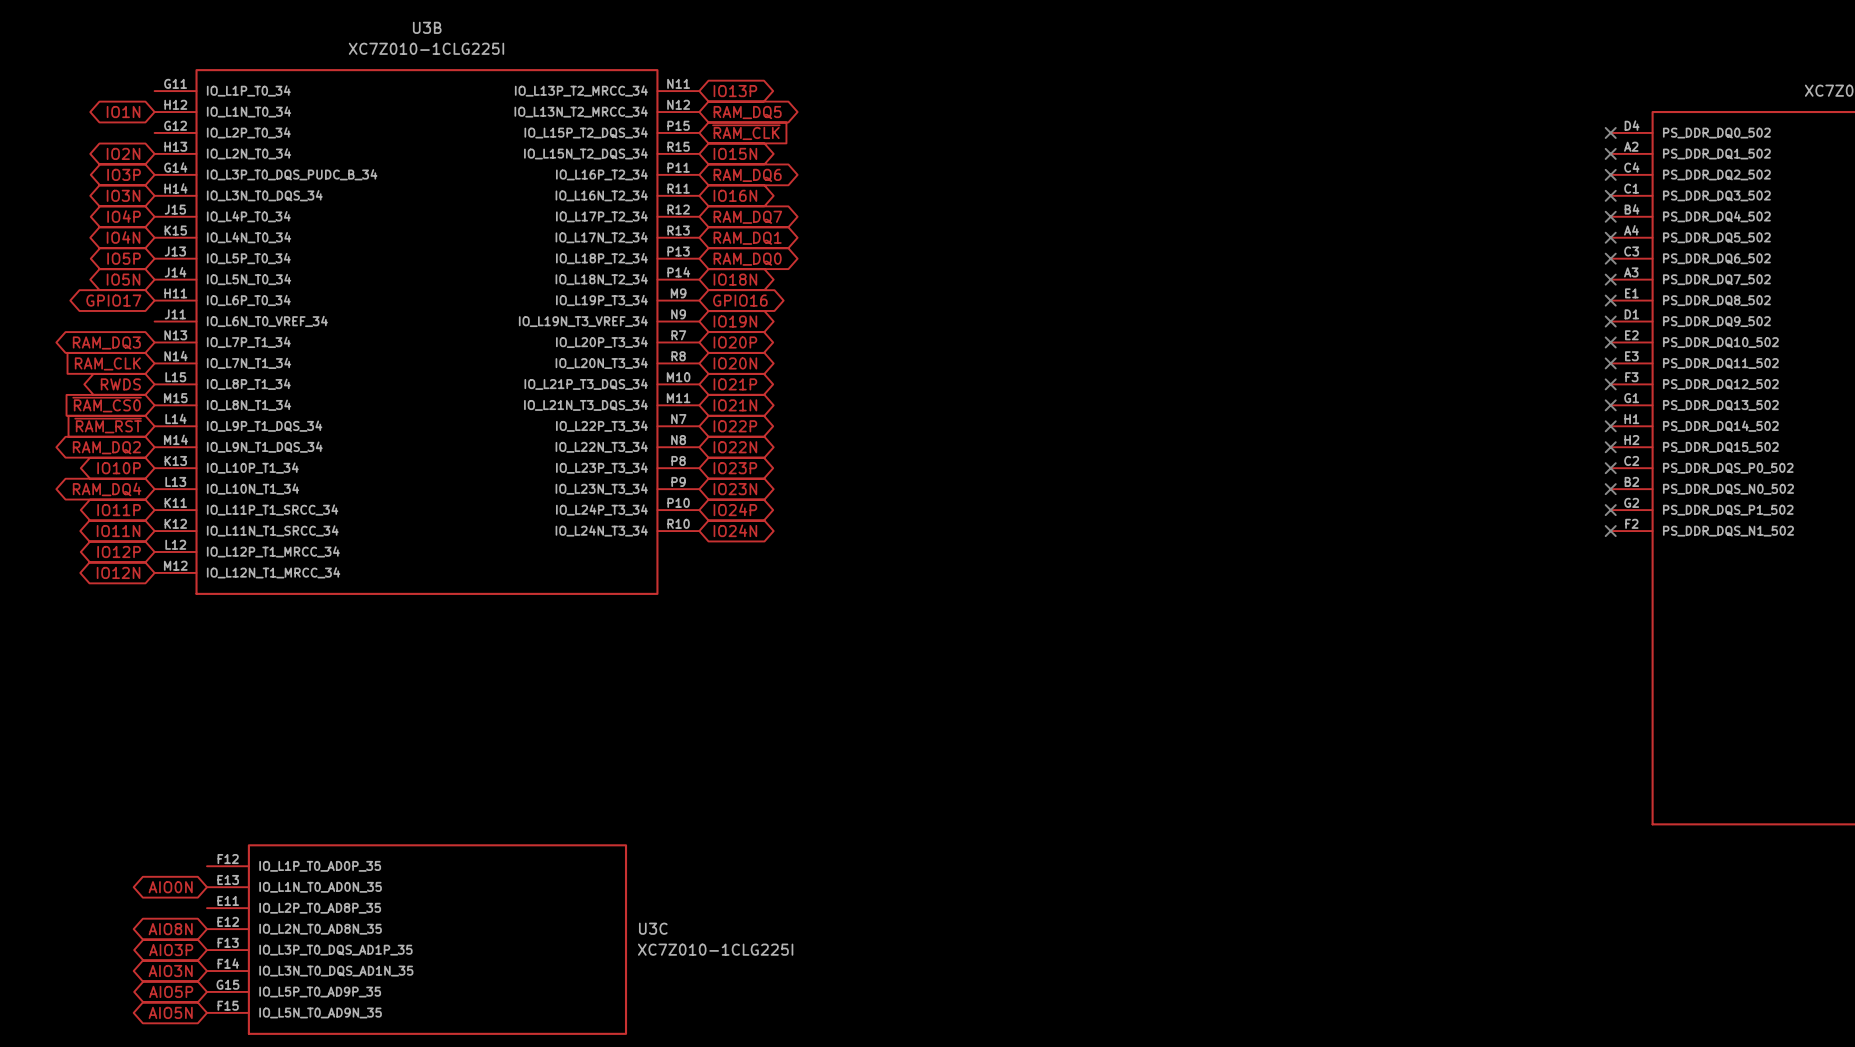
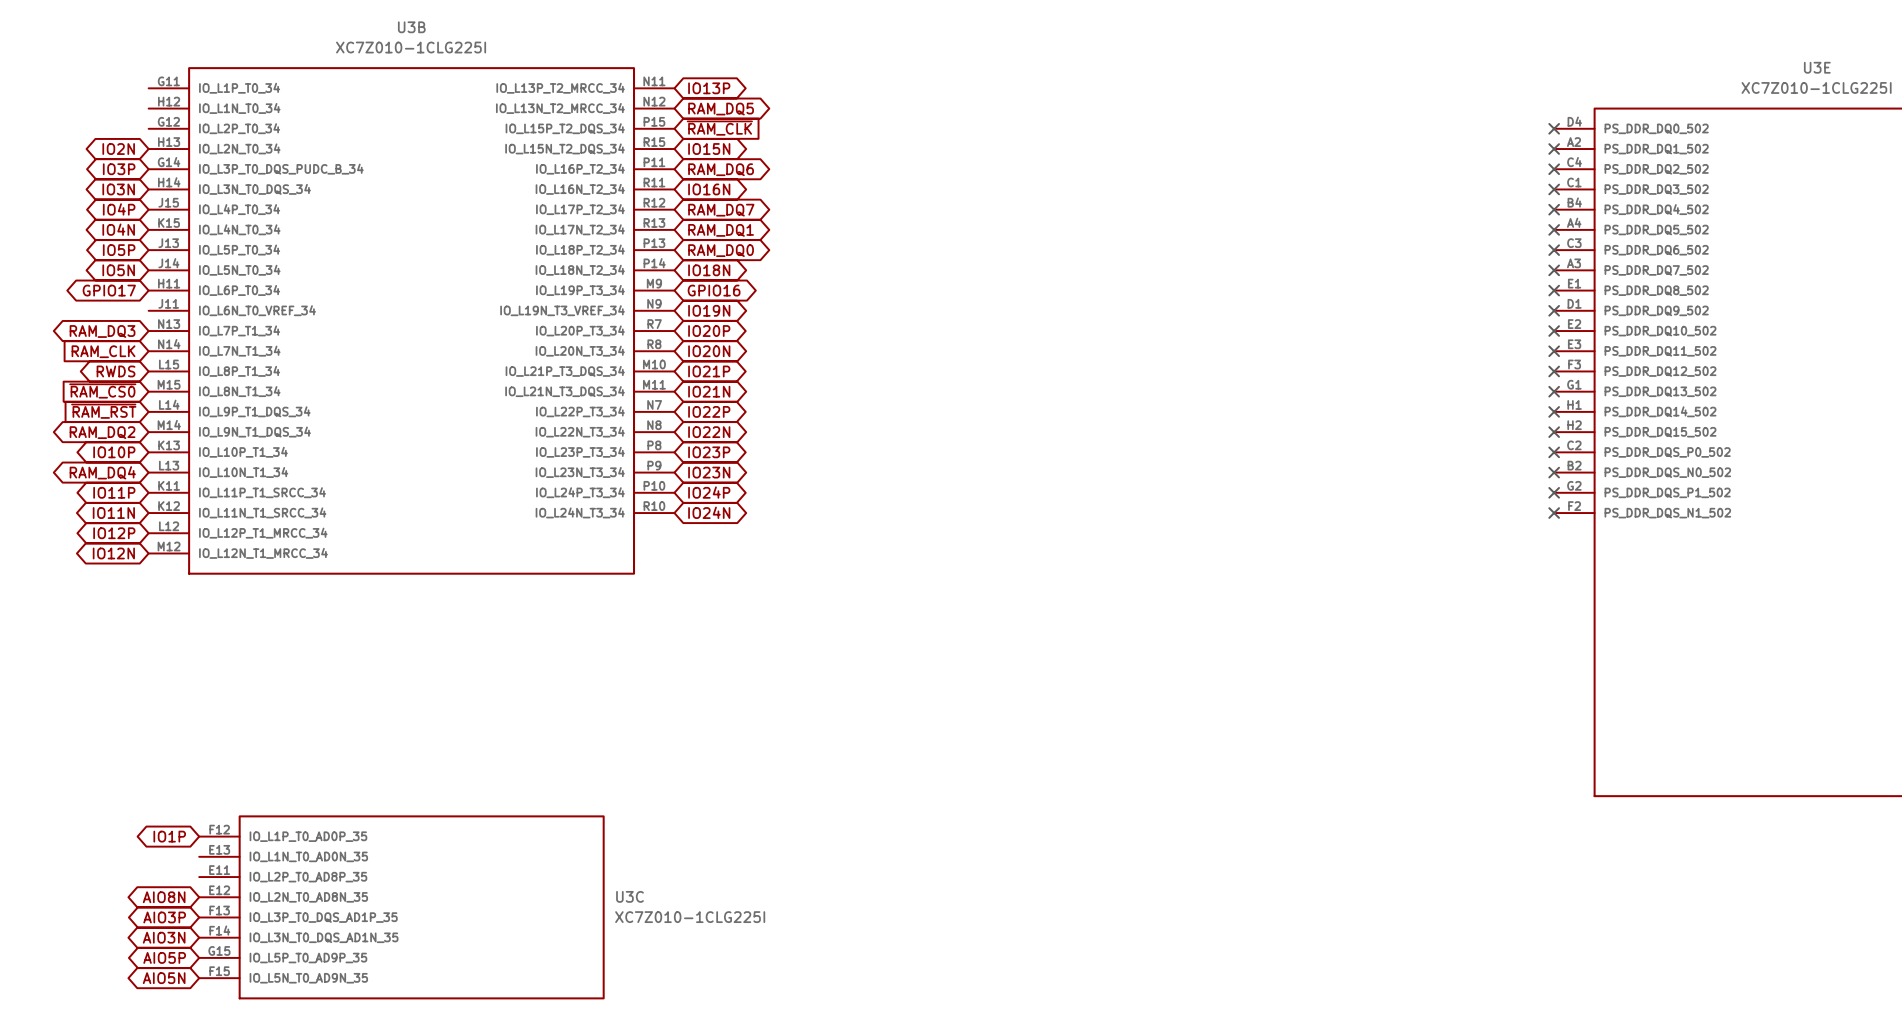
global label: IO1N (123, 112) -> none
global label: none -> IO1P (169, 836)
global label: AIO0N (170, 887) -> none

